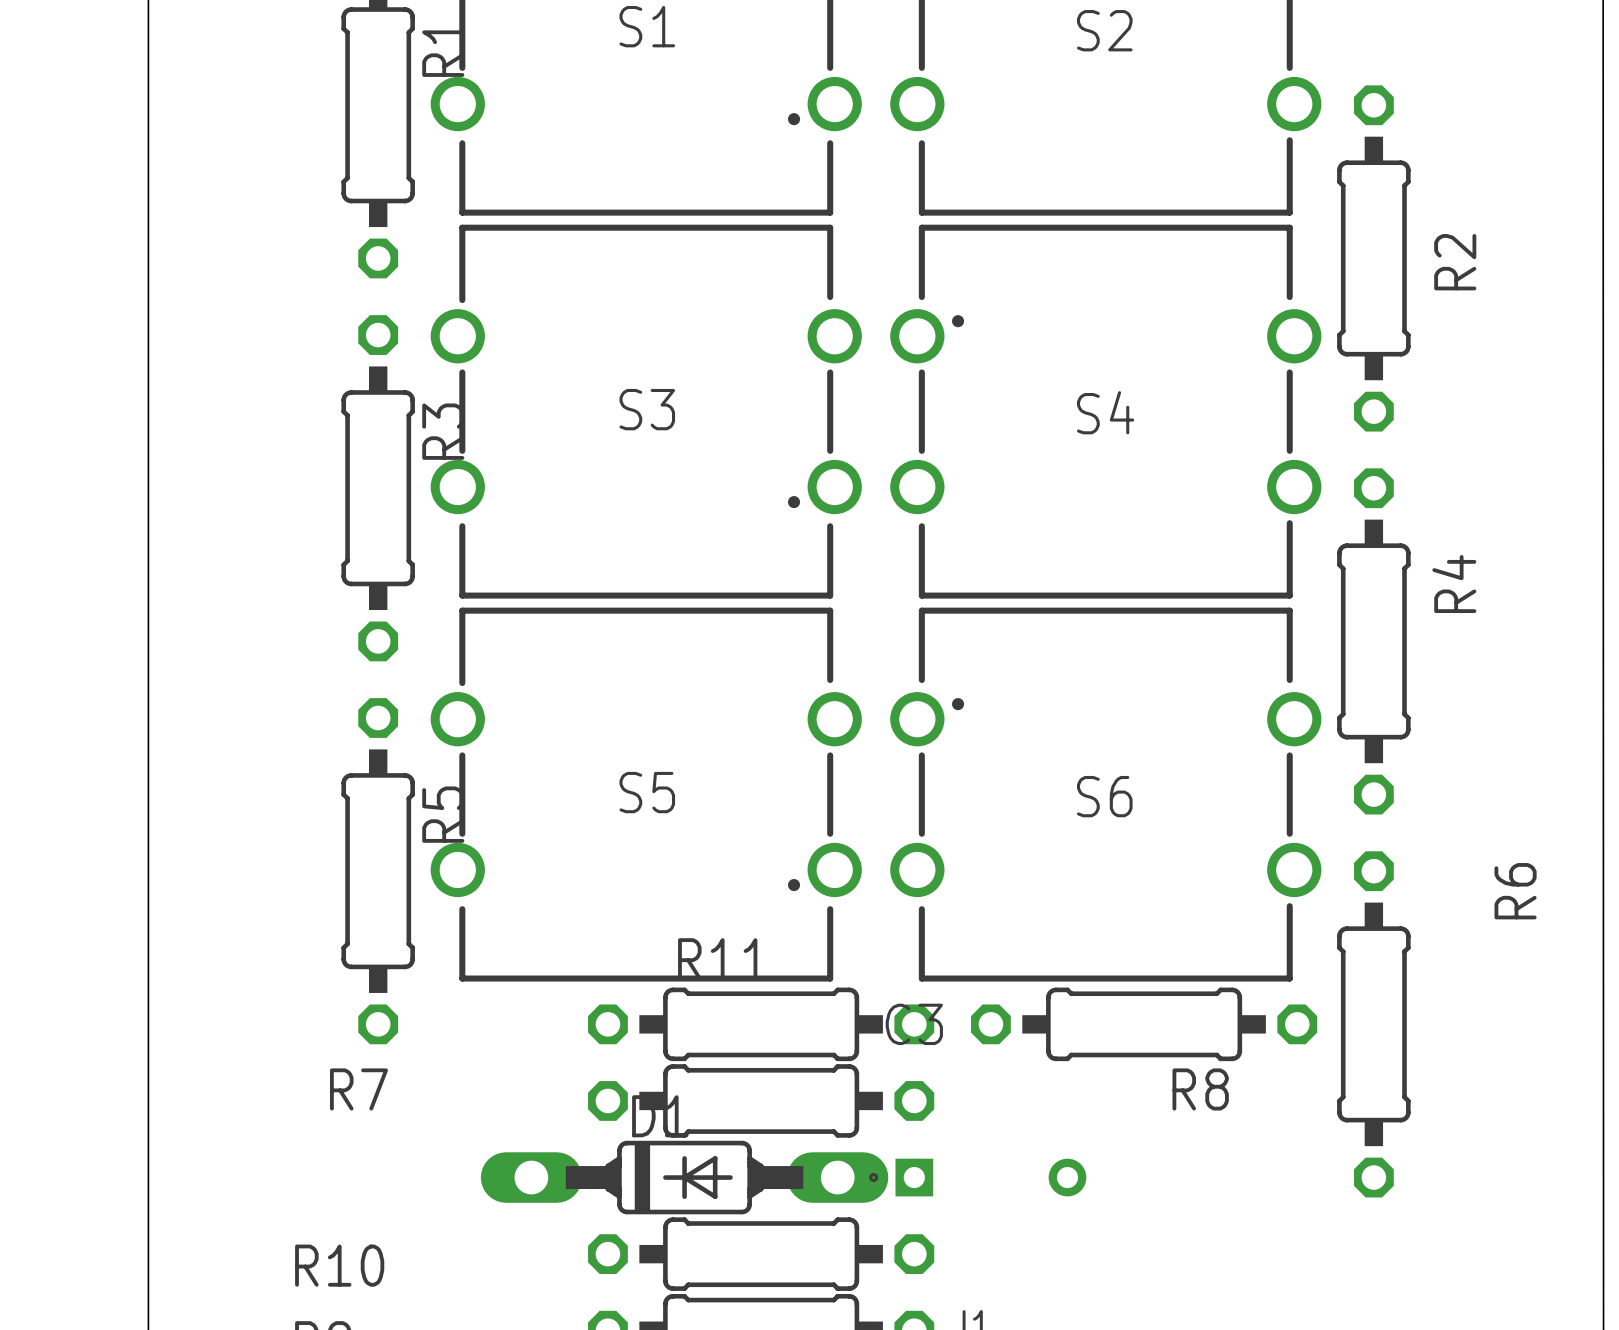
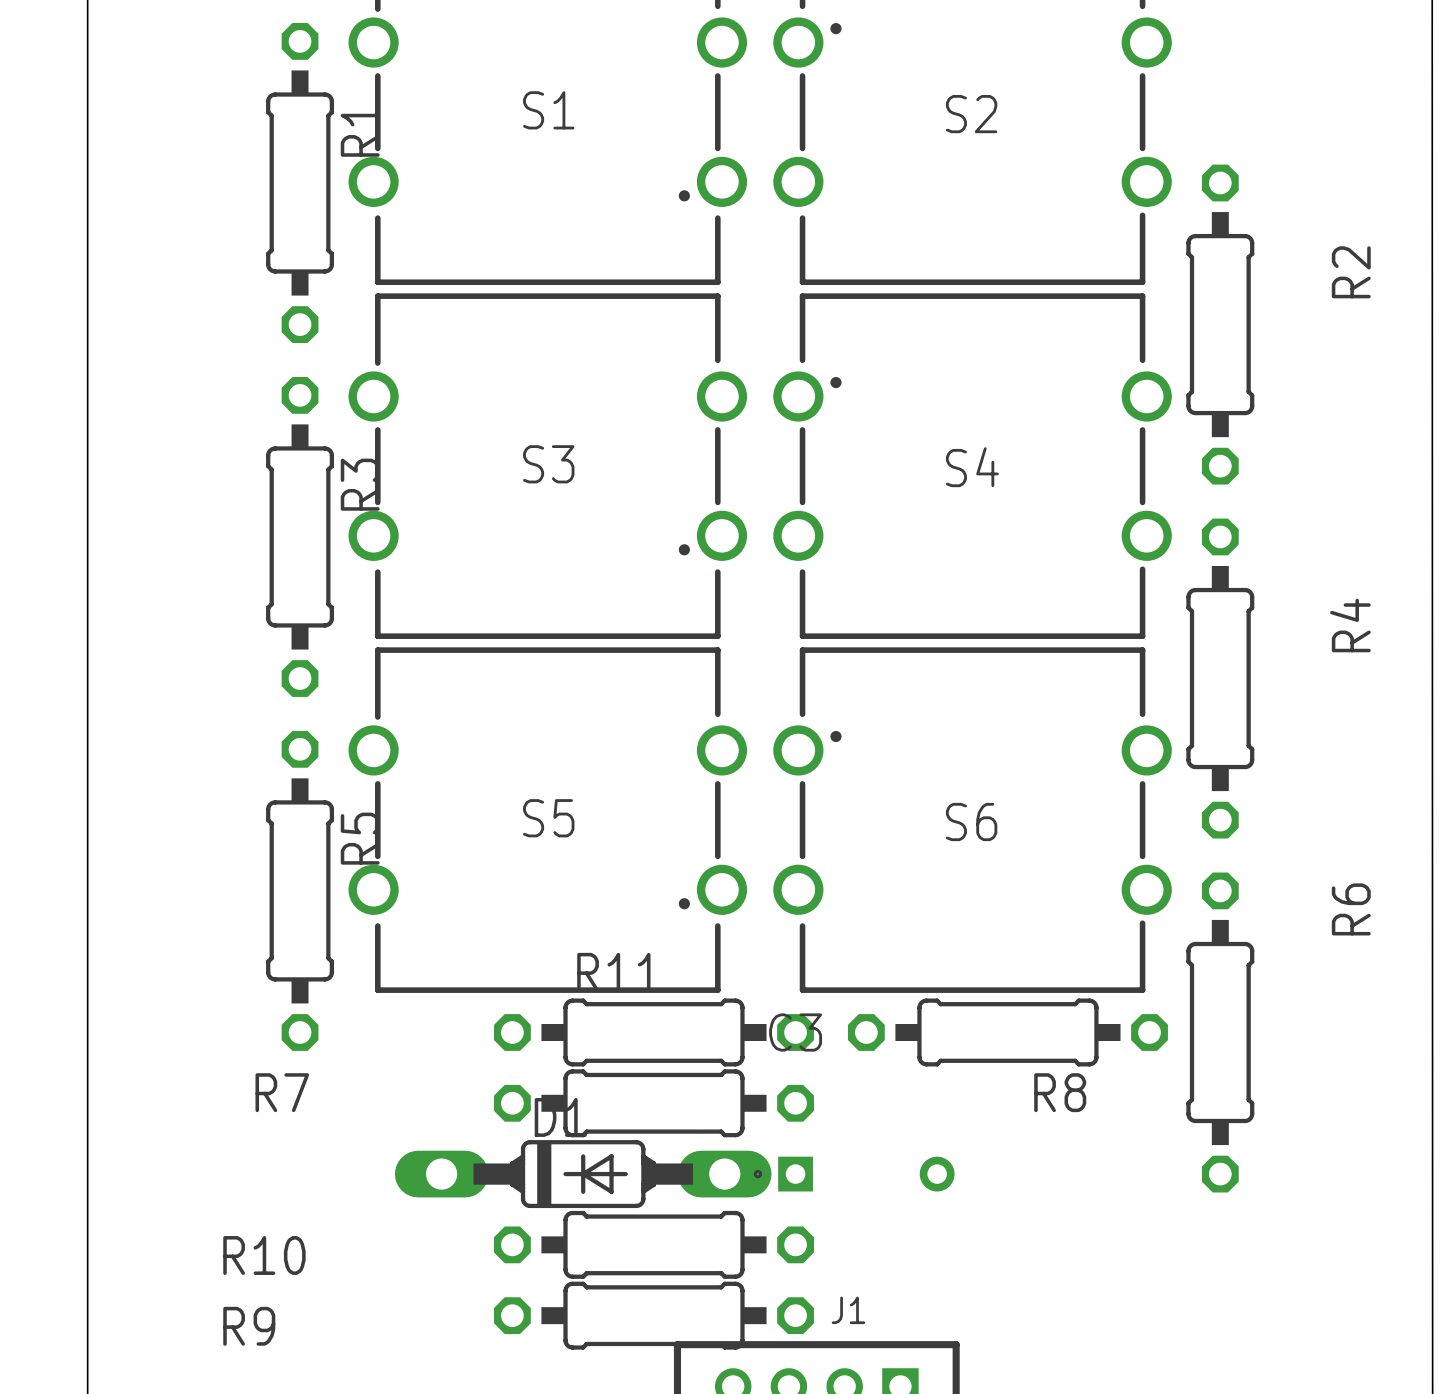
R2 name position: R2 (1455, 262) -> R2 (1351, 272)
R4 name position: R4 (1454, 584) -> R4 (1350, 625)

